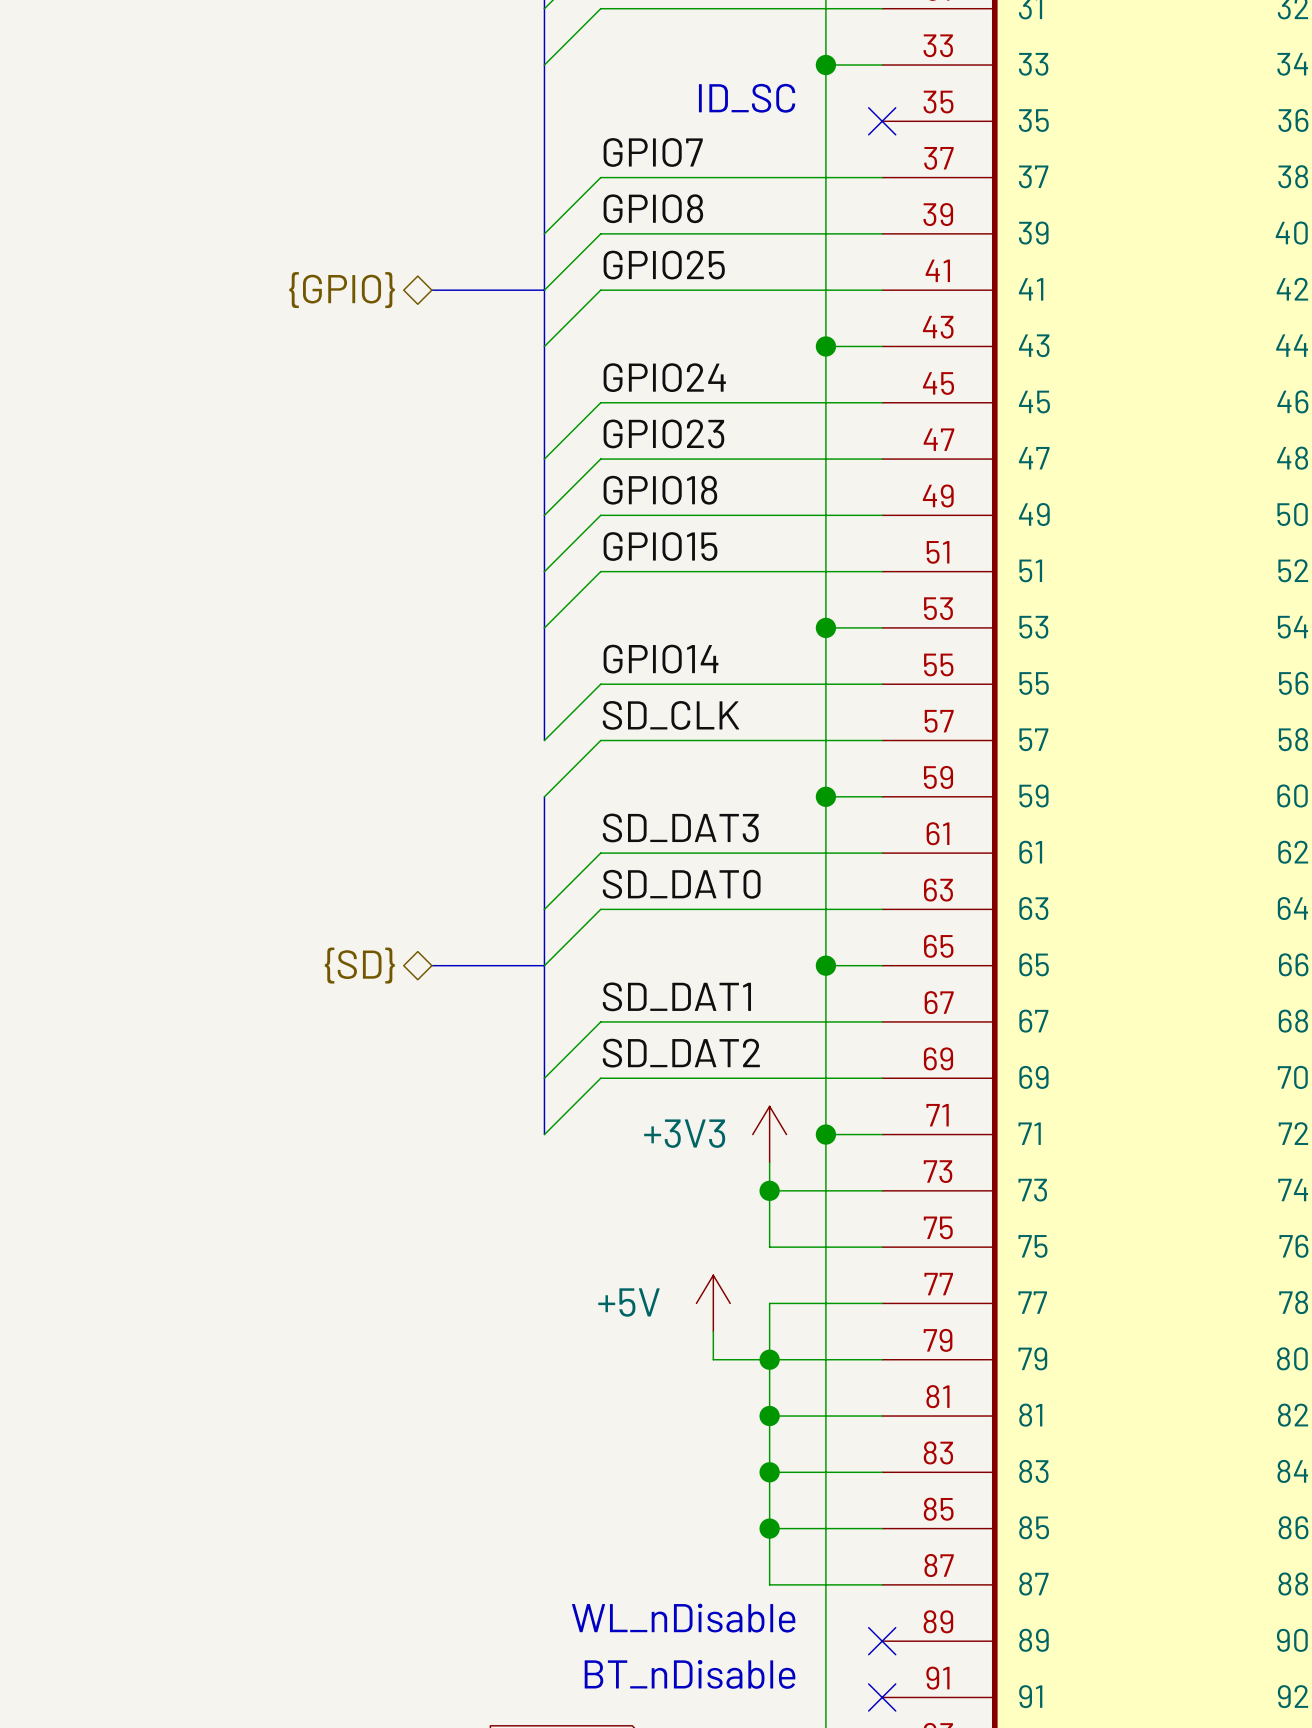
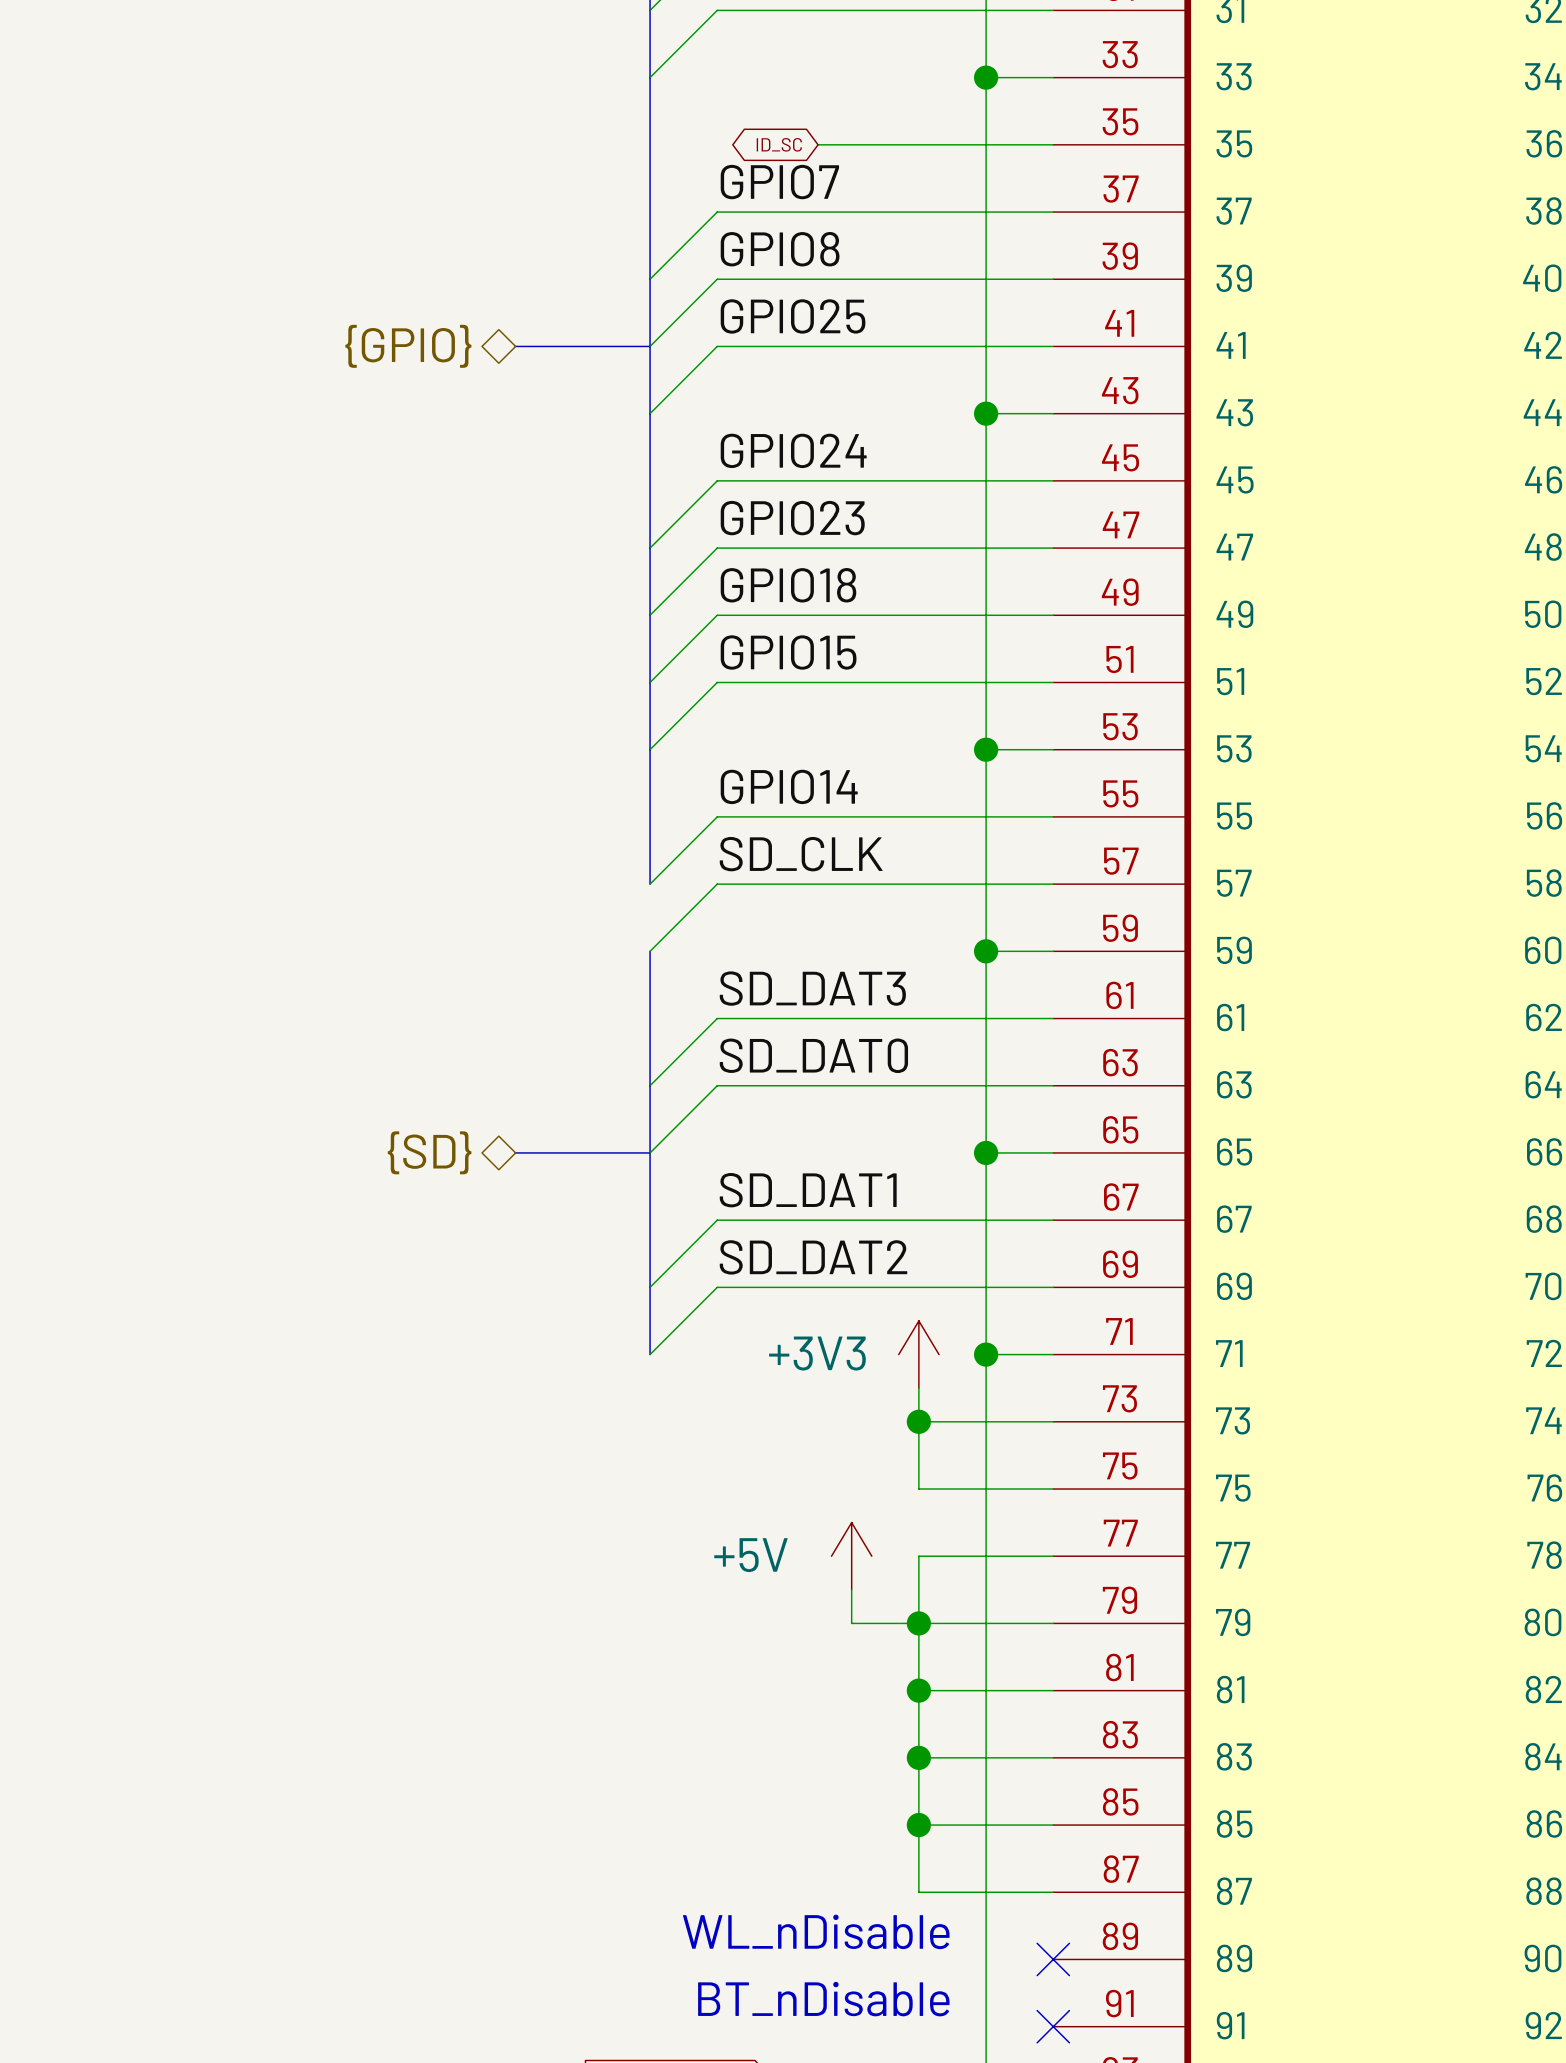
text: ID_SC (747, 98) -> none
global label: none -> ID_SC (779, 144)
wire: none -> (818, 144) (1053, 144)
no-connect mark: (882, 121) -> none

